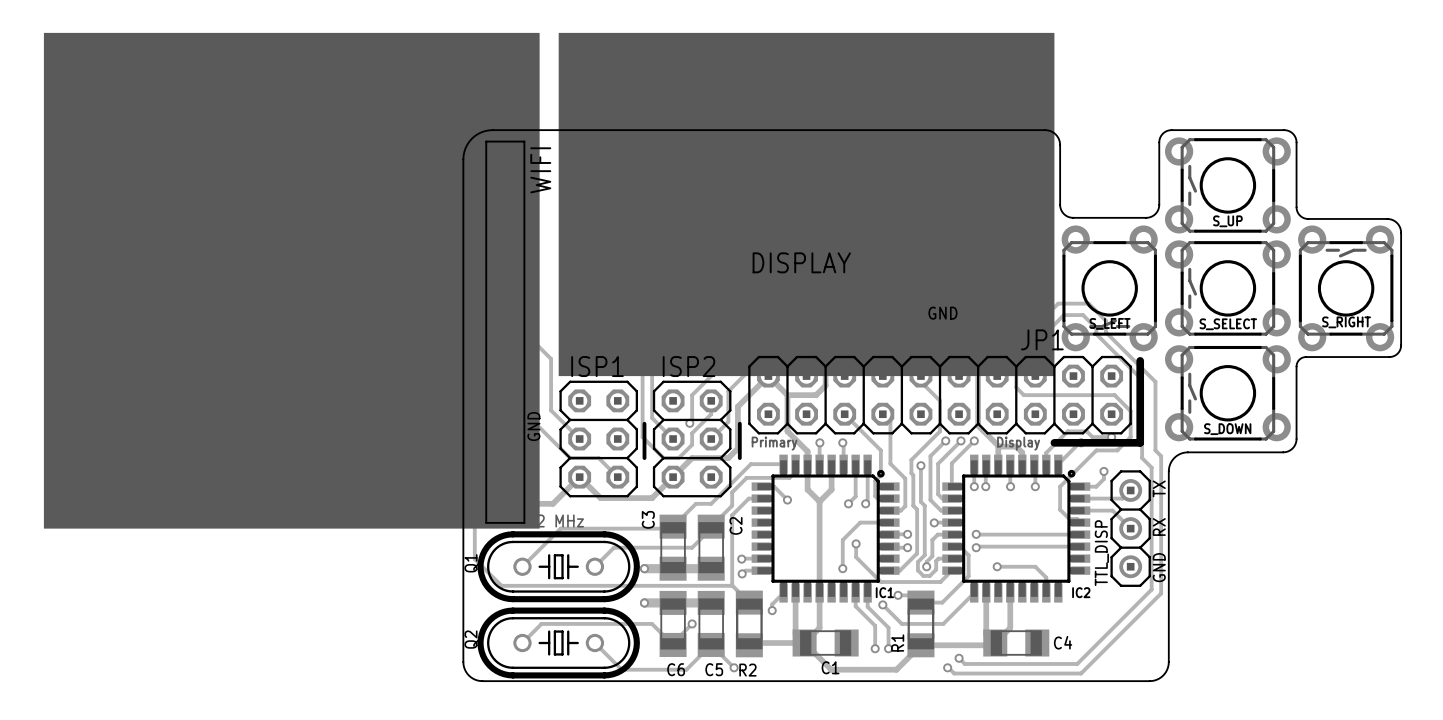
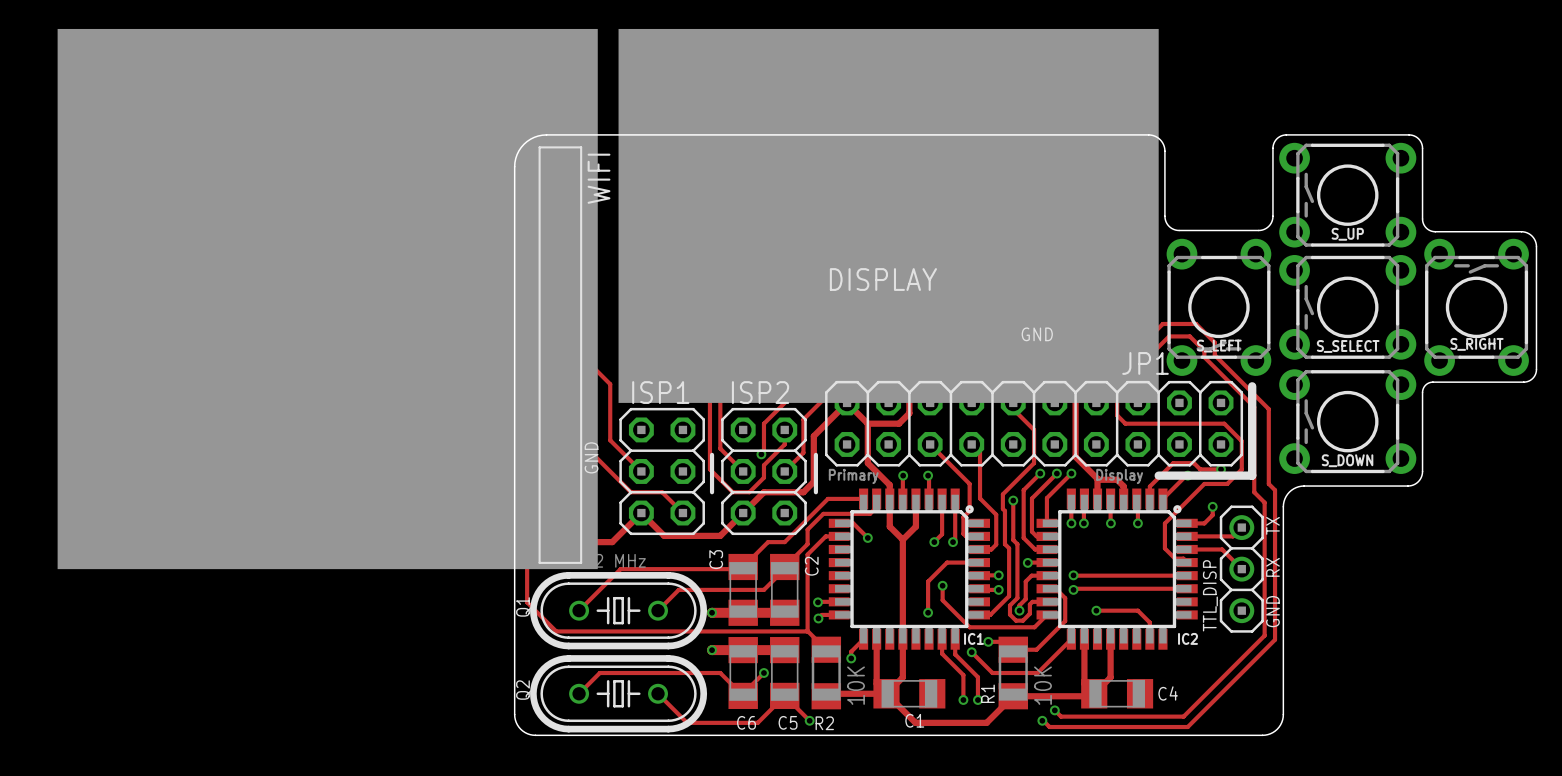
R2 value: none -> 10K (856, 685)
R1 value: none -> 10K (1042, 685)

